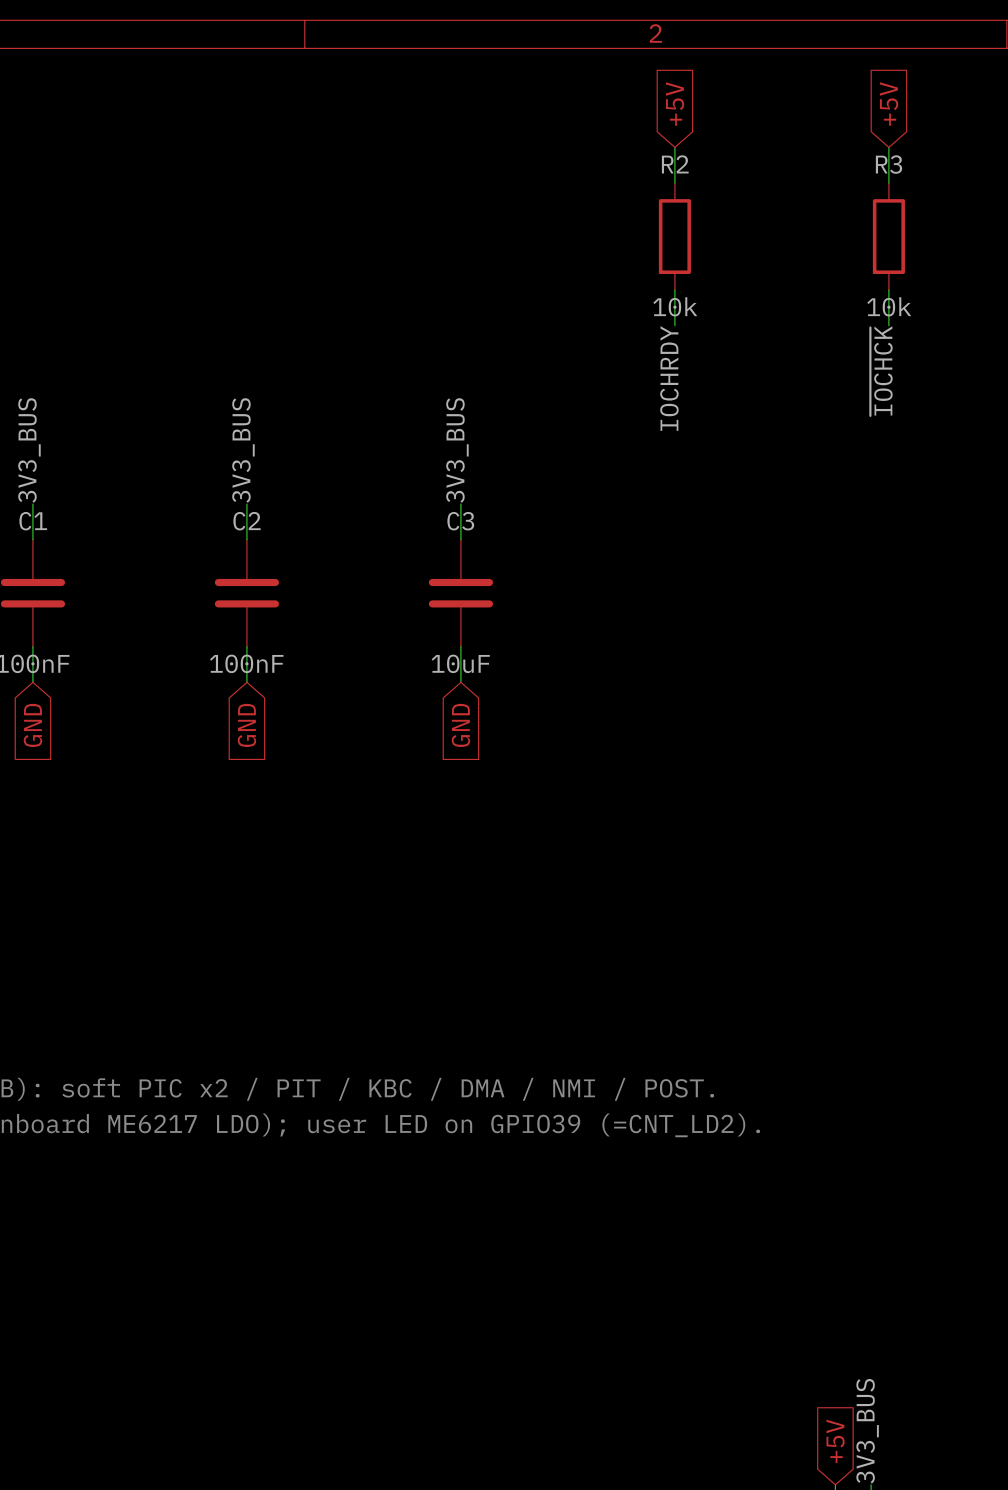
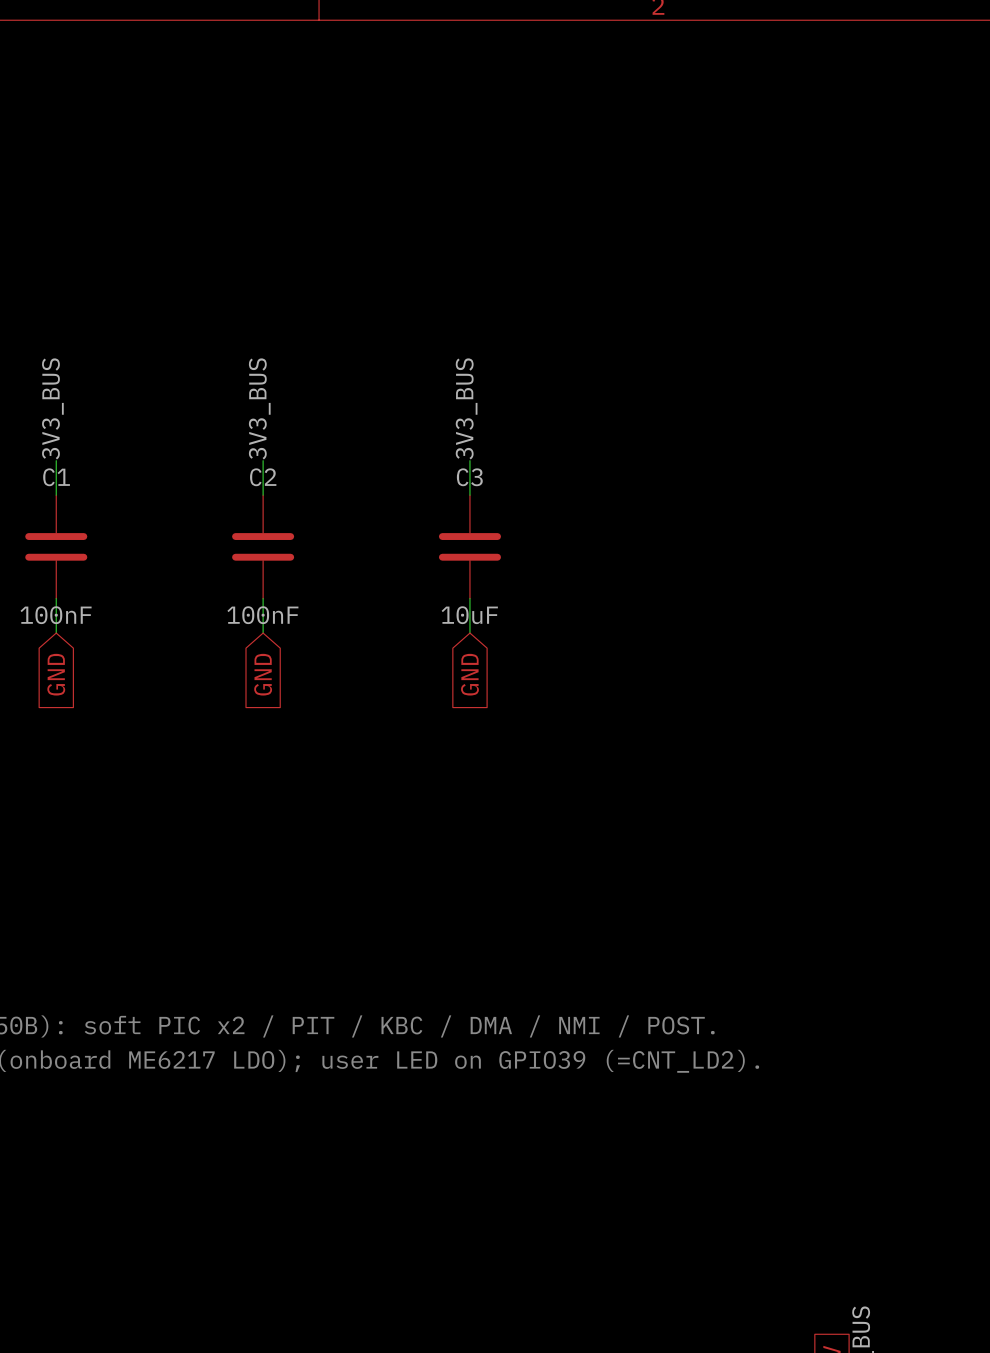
global label: +5V (675, 104) -> none
global label: +5V (889, 104) -> none
wire: (674, 147) (674, 183) -> none
wire: (888, 147) (888, 183) -> none
R2: 10k (674, 236) -> none
R3: 10k (888, 236) -> none
wire: (674, 290) (674, 325) -> none
wire: (888, 290) (888, 325) -> none
label: ~{IOCHCK} (881, 371) -> none
label: IOCHRDY (669, 378) -> none

